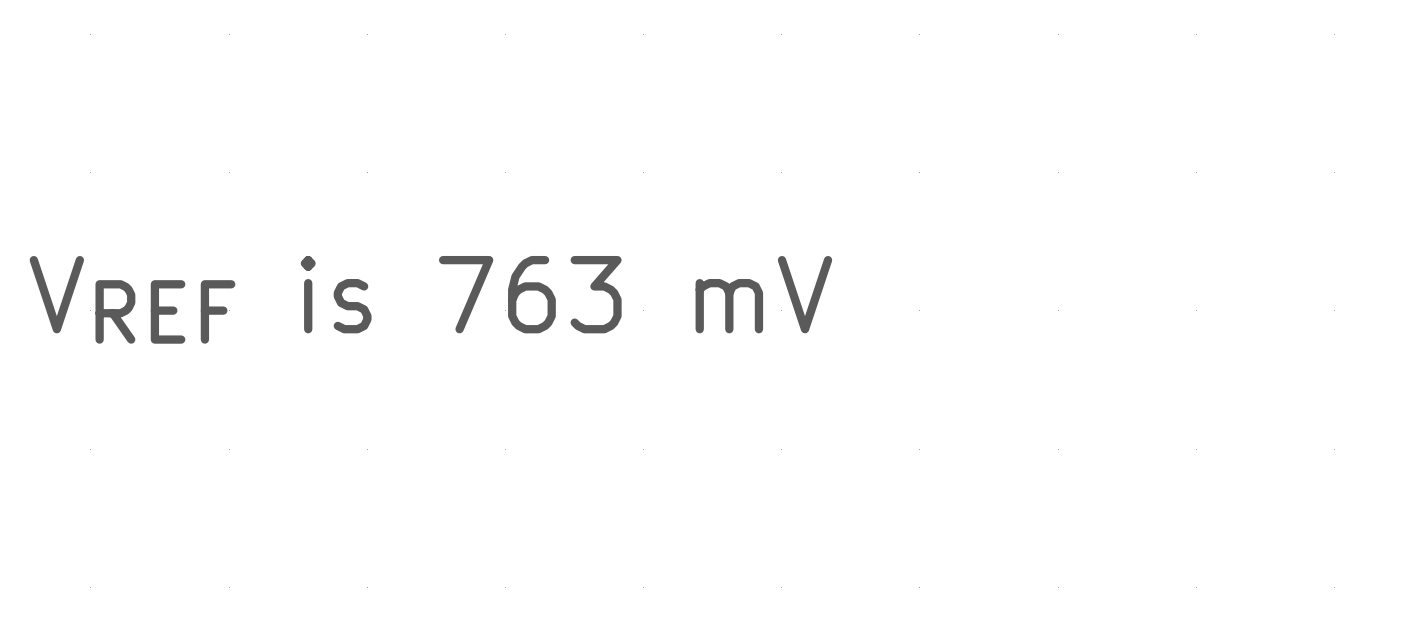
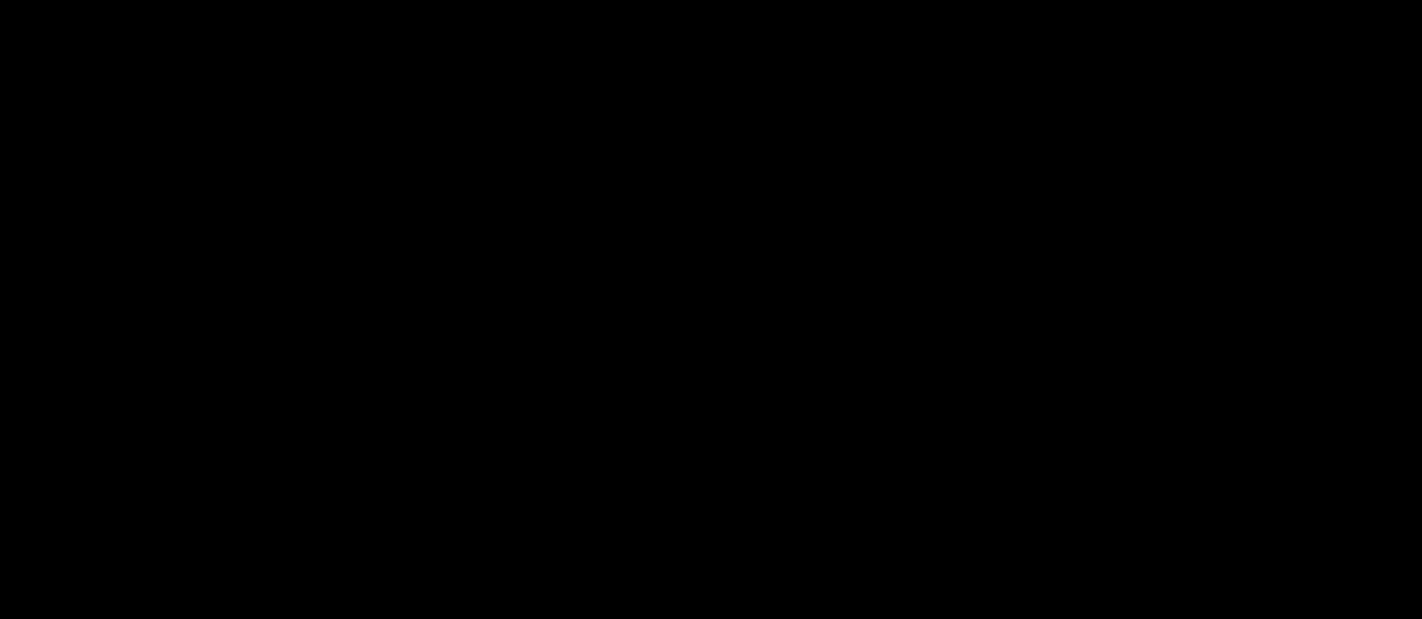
text: VREF is 763 mV (430, 299) -> none

